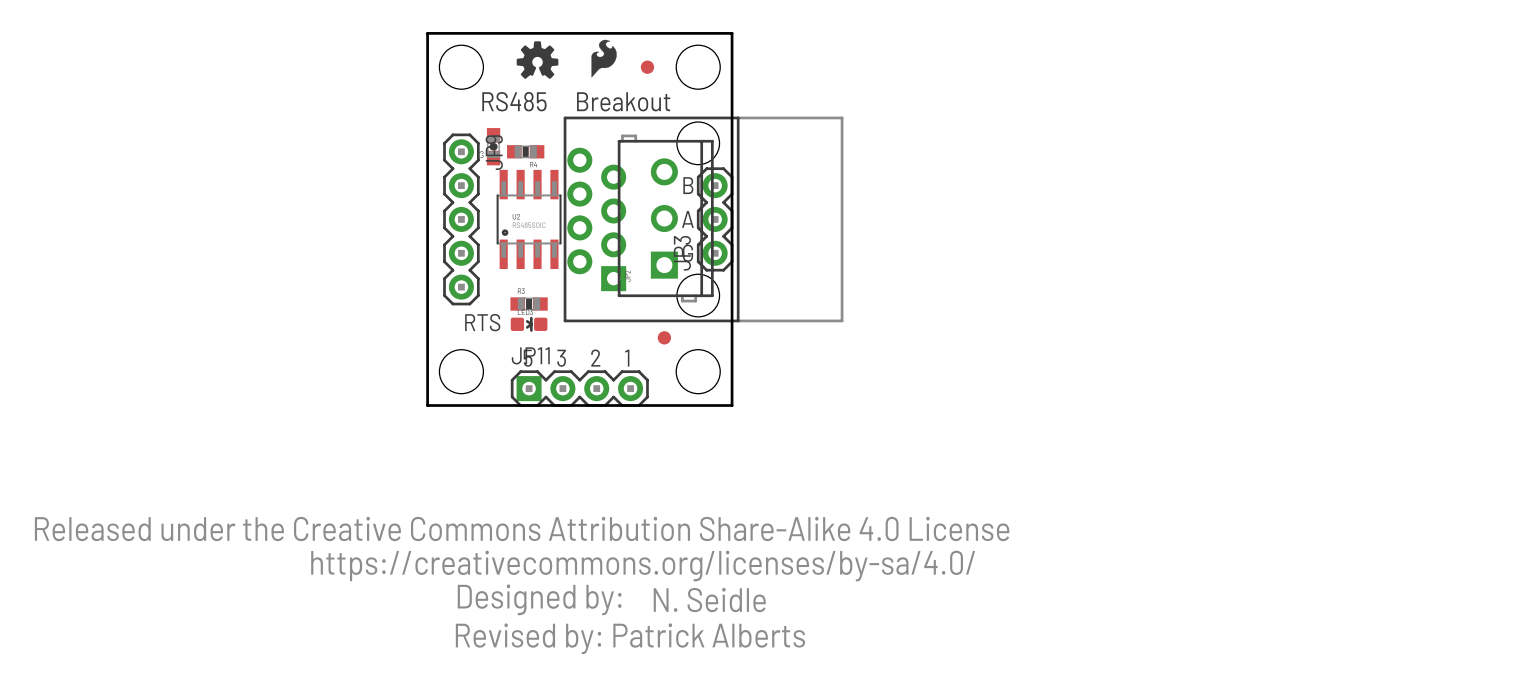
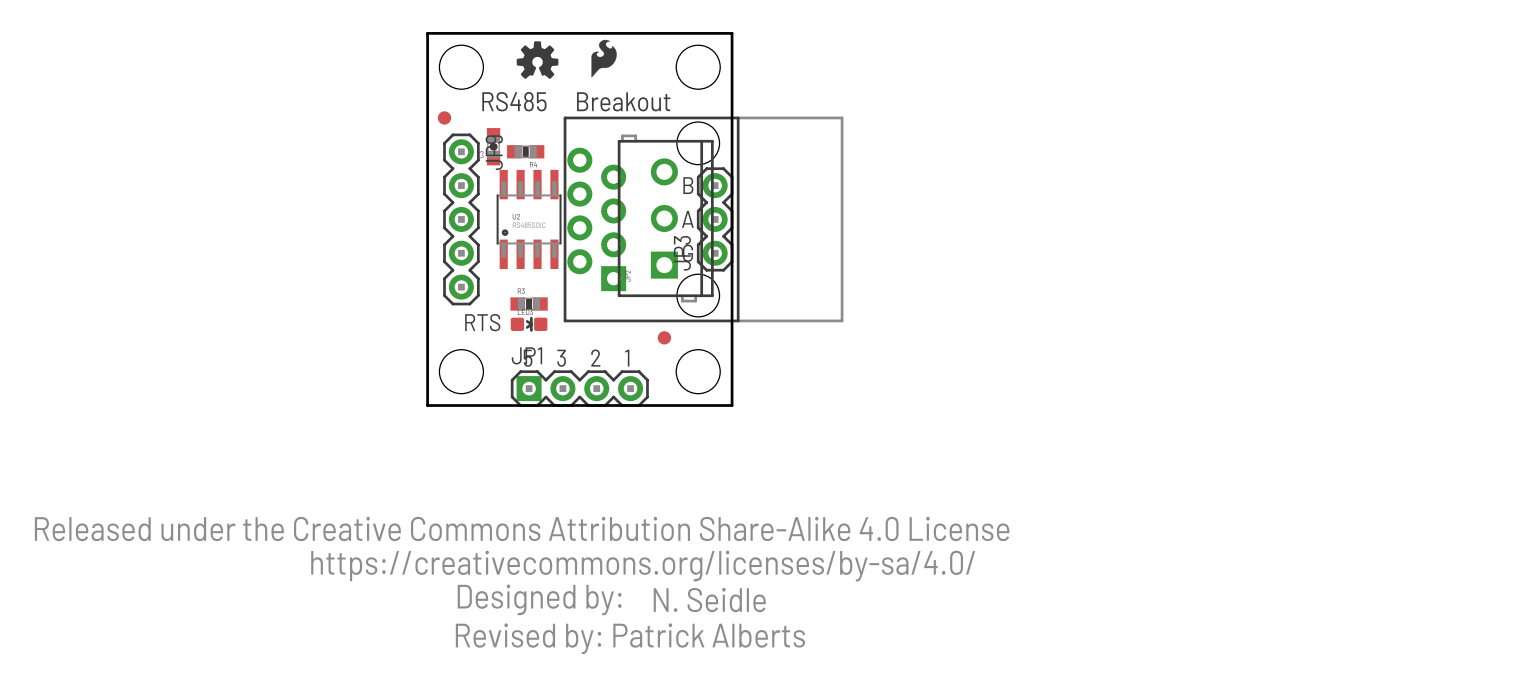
part position: (647, 67) -> (444, 117)
JP11 name: JP11 (530, 355) -> JP1 (526, 355)

